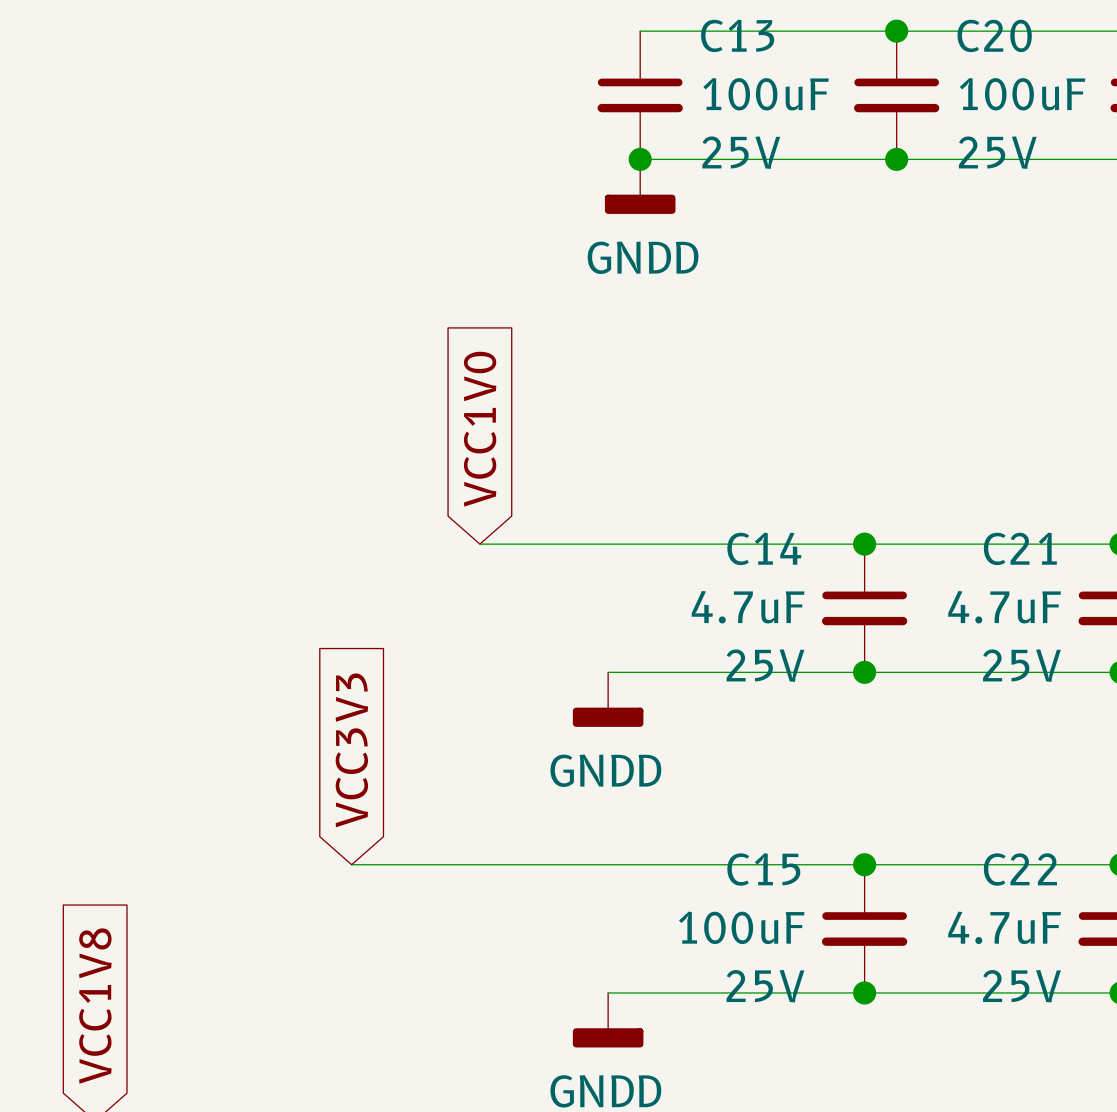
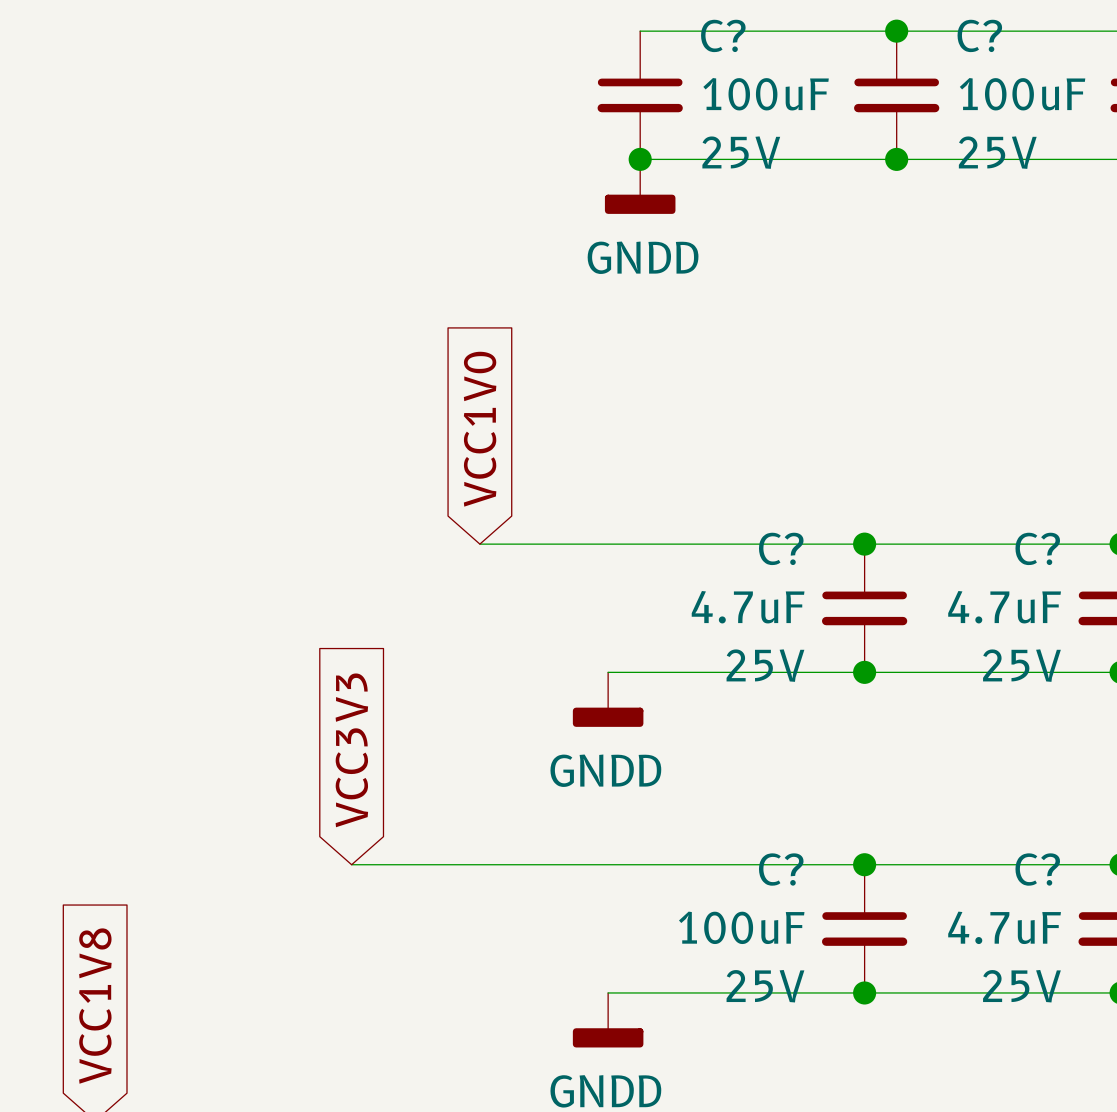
C13 name: C13 (737, 35) -> C? (723, 35)
C20 name: C20 (994, 35) -> C? (979, 35)
C14 name: C14 (764, 548) -> C? (781, 548)
C21 name: C21 (1020, 548) -> C? (1037, 548)
C15 name: C15 (763, 869) -> C? (781, 869)
C22 name: C22 (1020, 869) -> C? (1037, 869)

